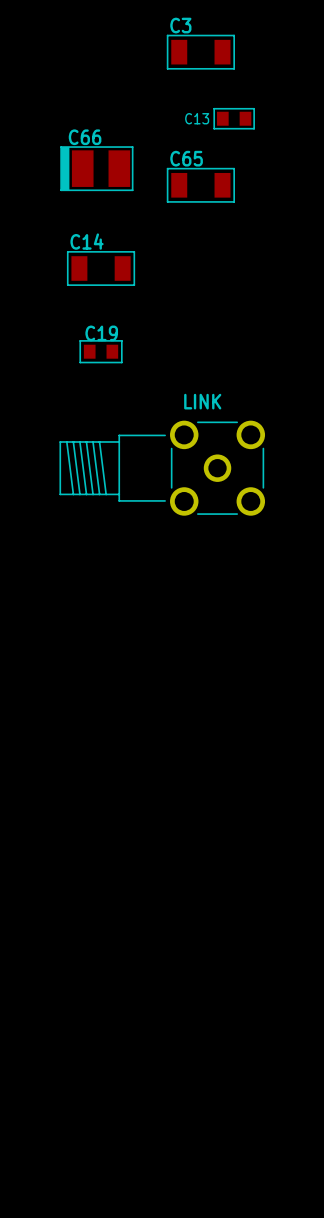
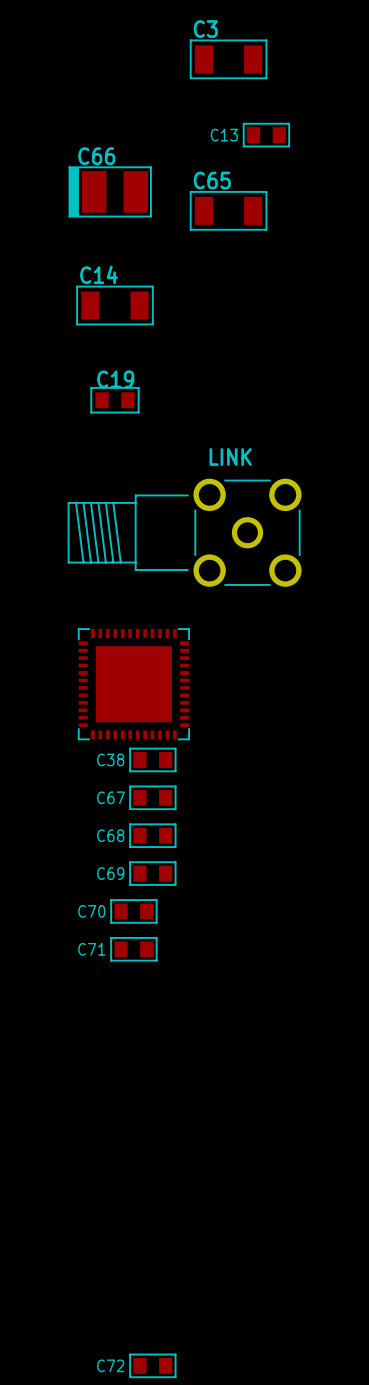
part: none -> (133, 684)
C38: none -> (152, 759)
C67: none -> (152, 797)
C68: none -> (152, 835)
C69: none -> (152, 873)
C70: none -> (133, 911)
C71: none -> (133, 949)
C72: none -> (152, 1365)

